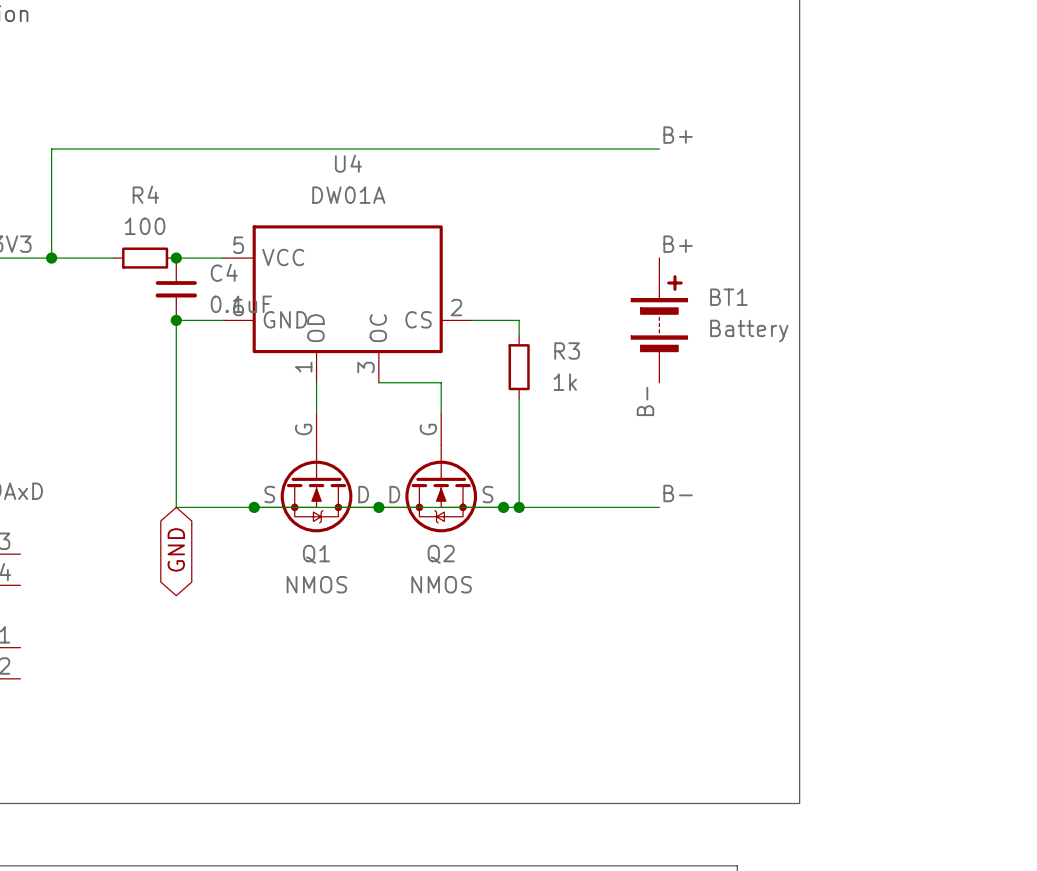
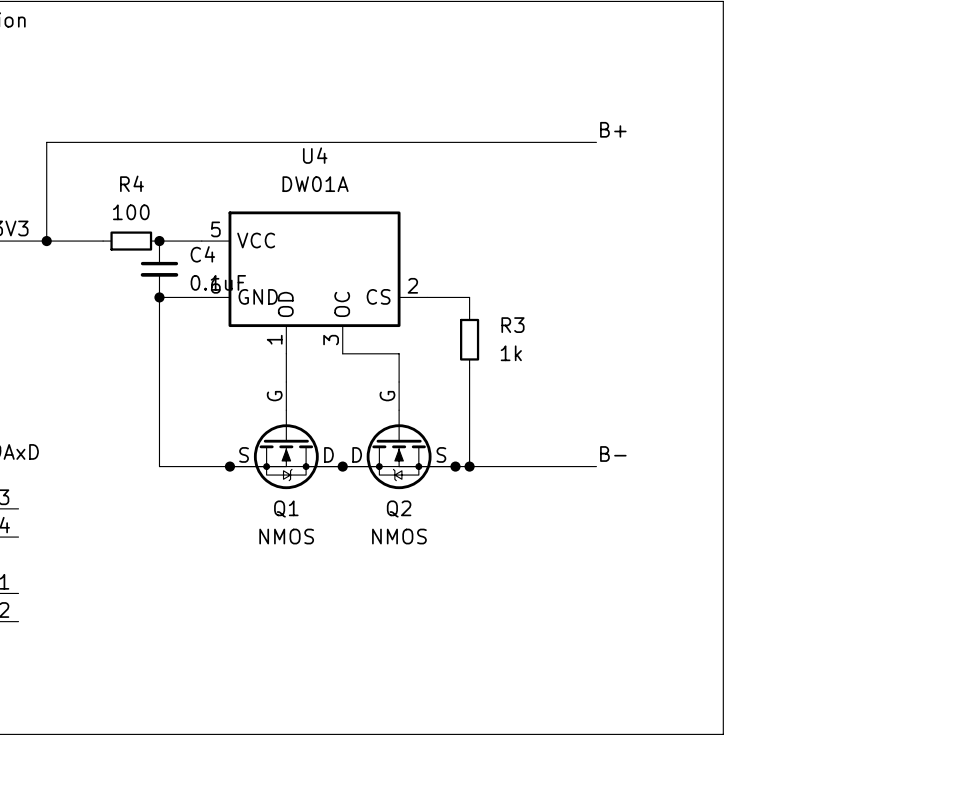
label: B+ (678, 244) -> none
BT1: Battery (659, 320) -> none
label: B- (645, 401) -> none
global label: GND (176, 549) -> none

